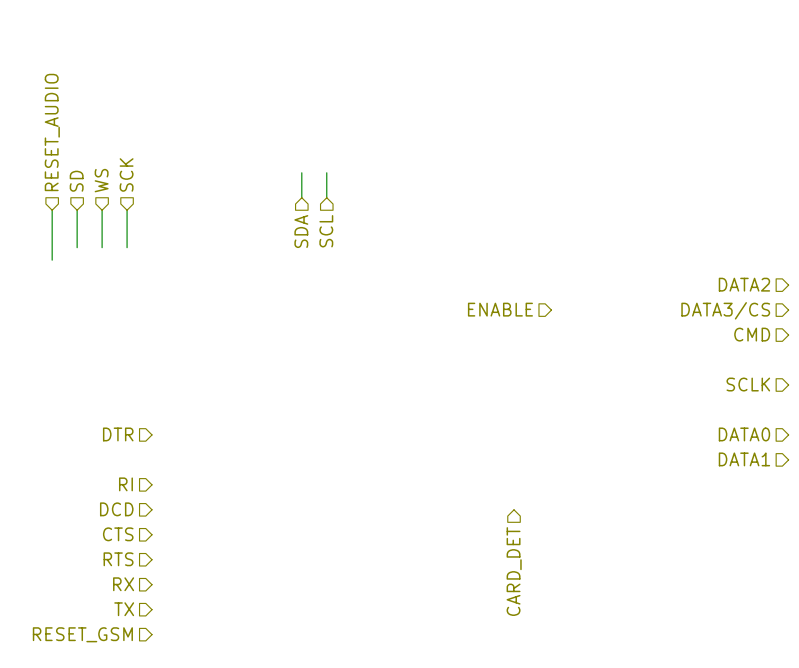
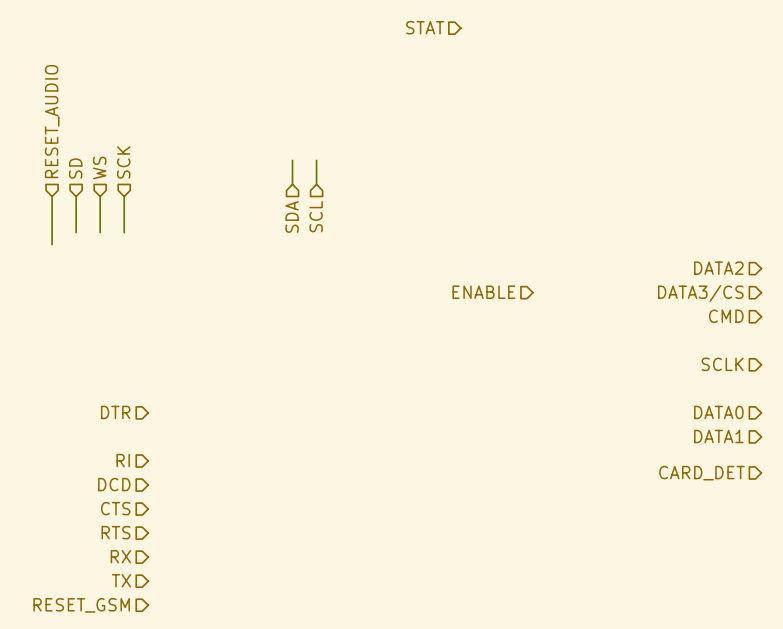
hierarchical label: none -> STAT (425, 27)
hierarchical label: none -> CARD_DET (701, 473)
hierarchical label: CARD_DET (514, 571) -> none

